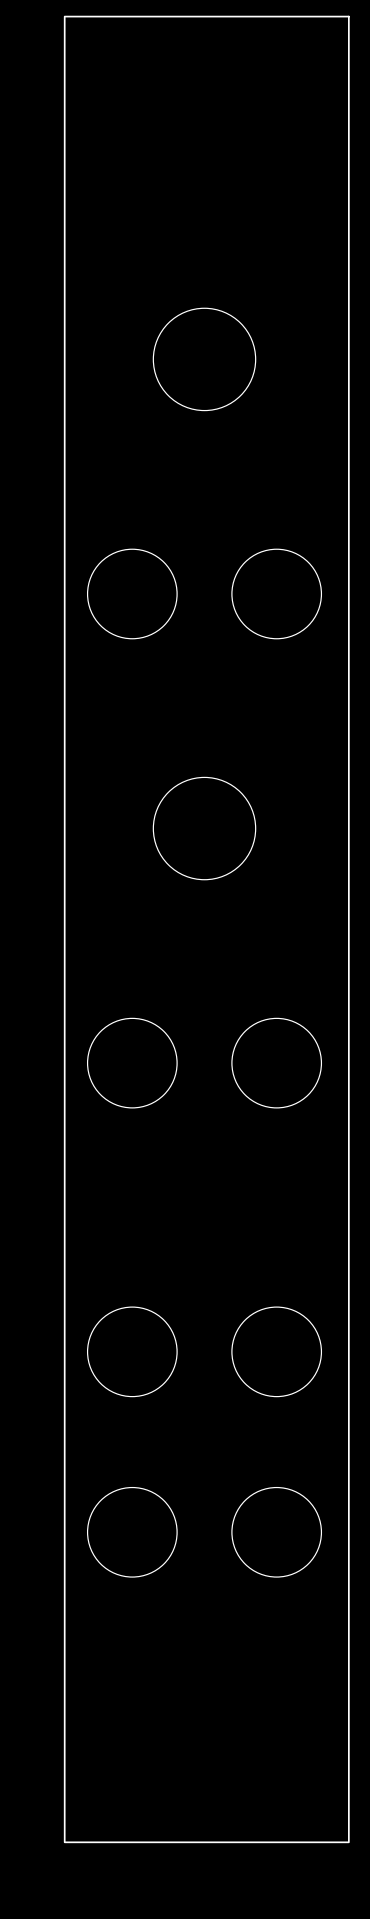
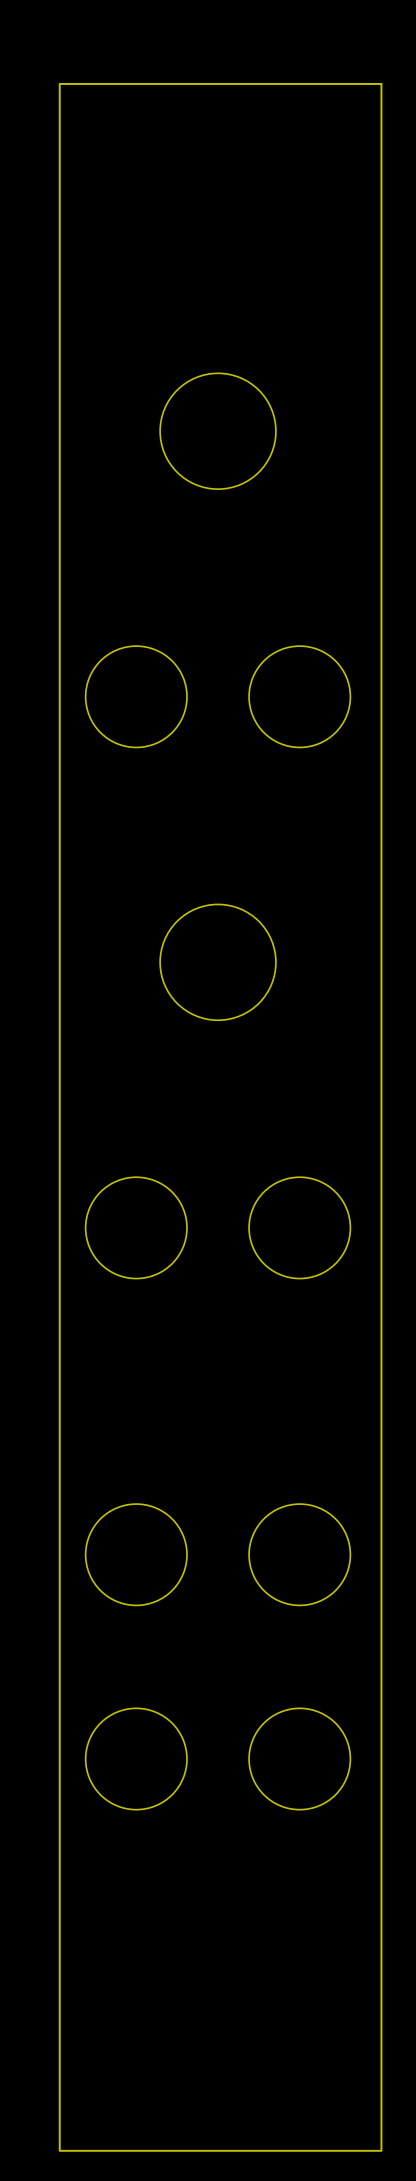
part position: (206, 929) -> (220, 1117)

